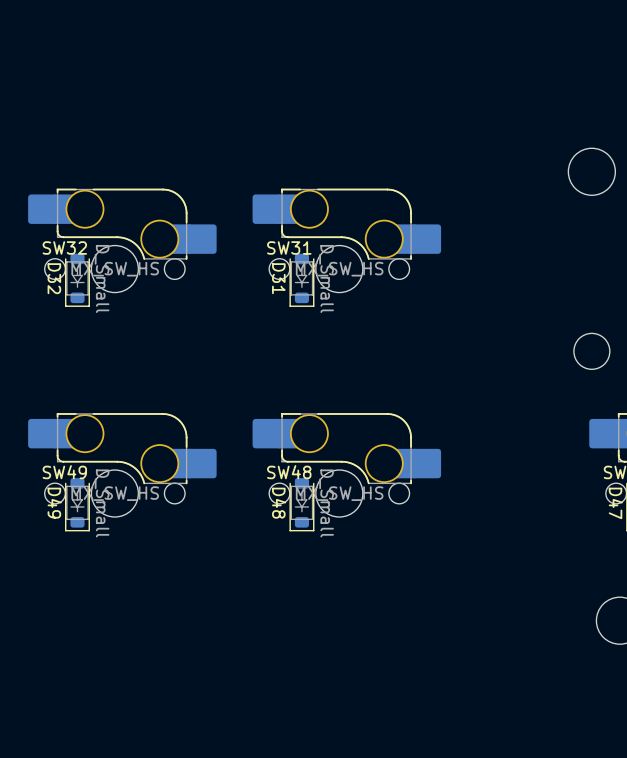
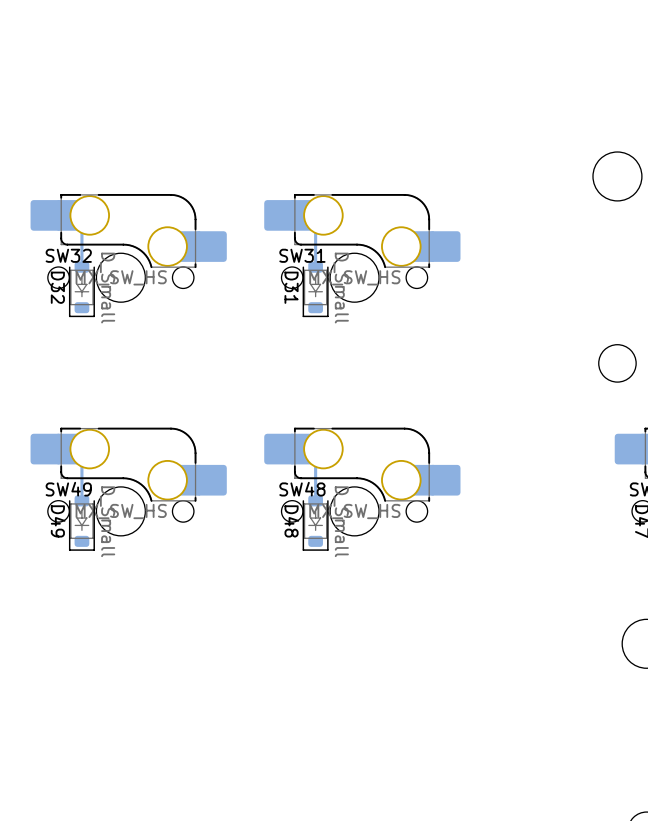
bottom track: none -> (89, 215) (81, 223) (81, 267)
bottom track: none -> (323, 215) (315, 223) (315, 267)
bottom track: none -> (89, 449) (81, 456) (81, 500)
bottom track: none -> (323, 449) (315, 456) (315, 500)

